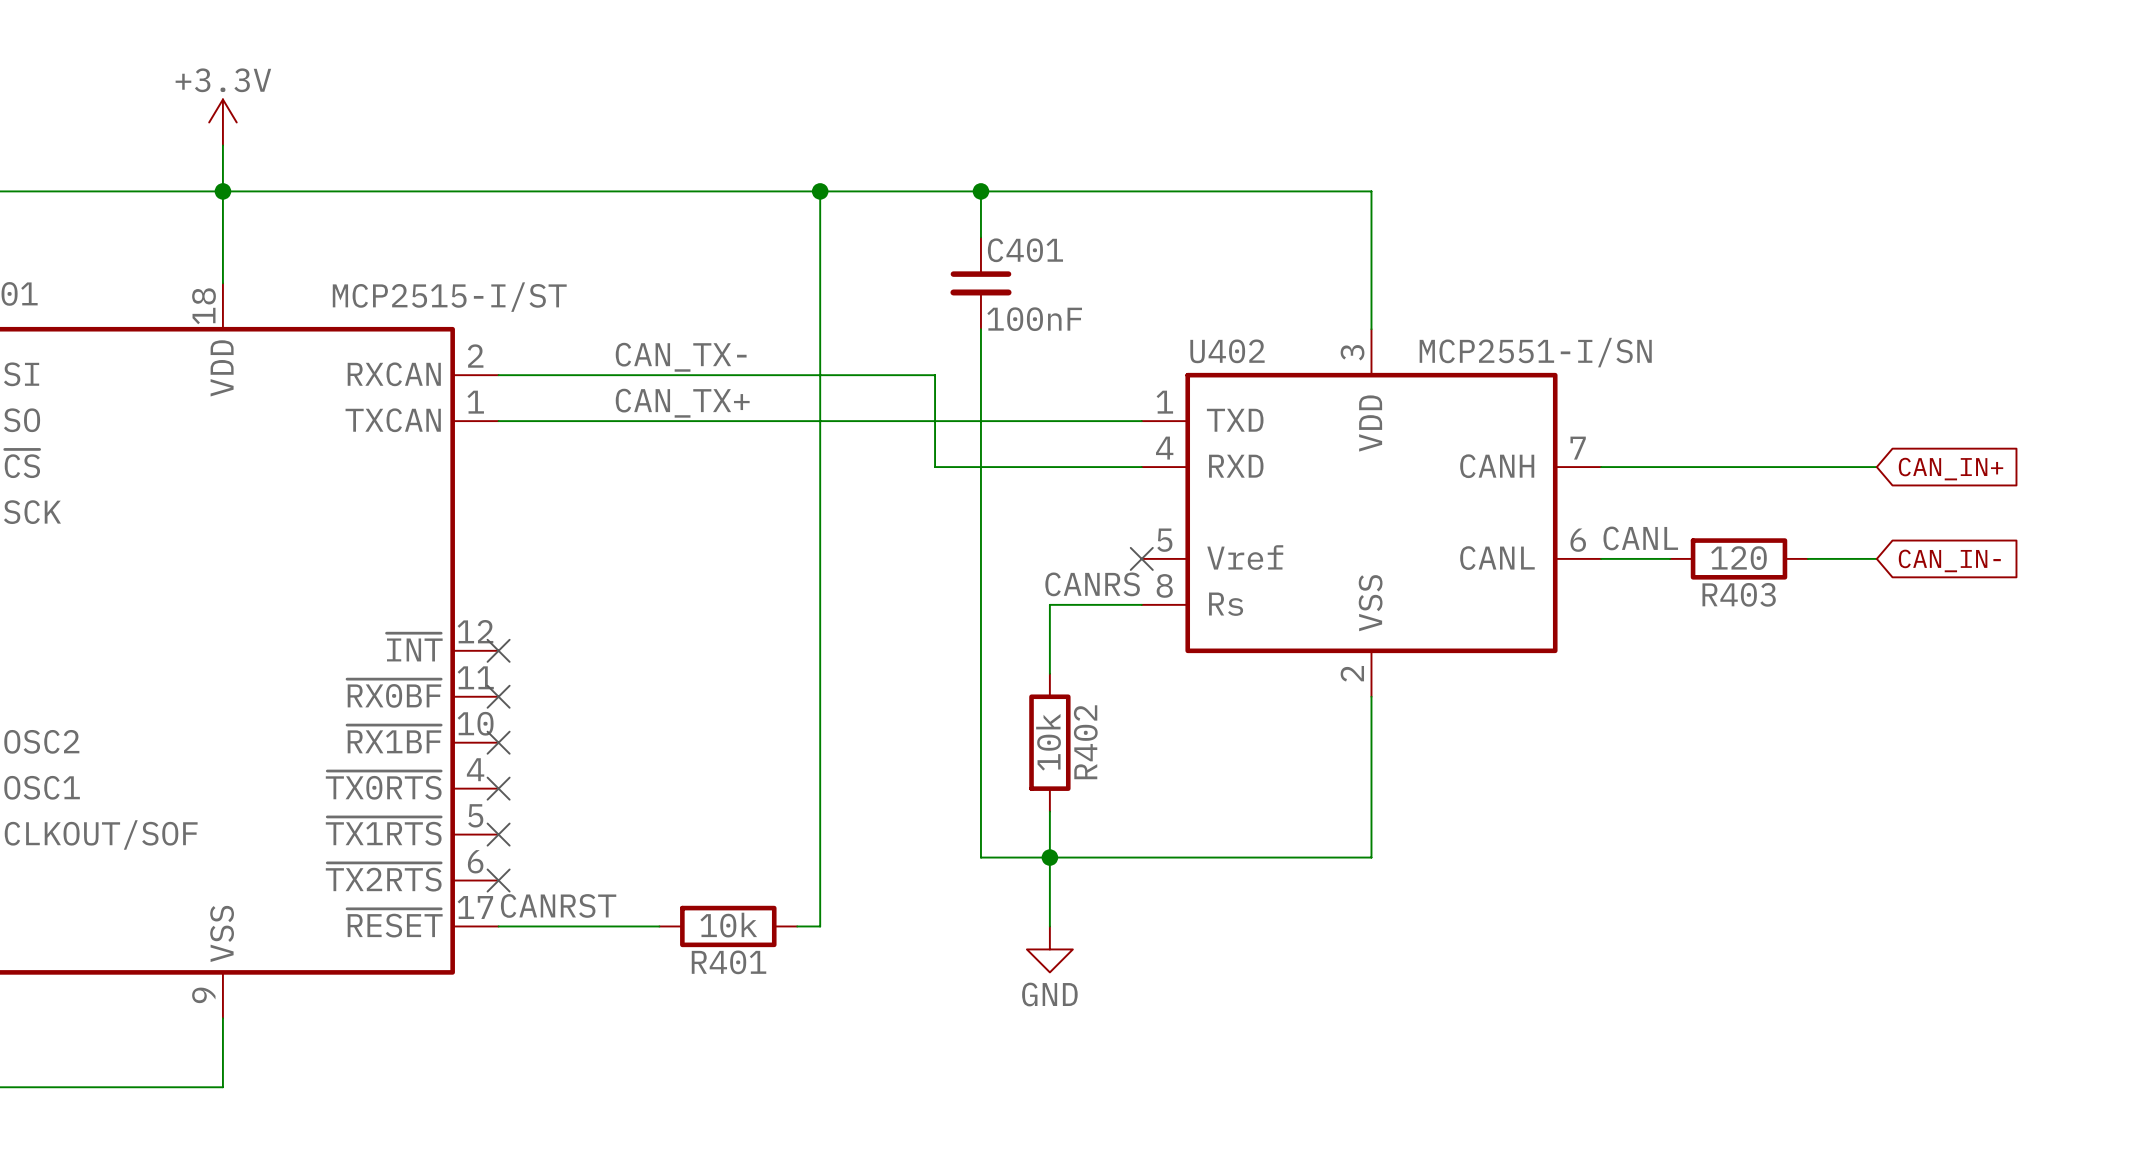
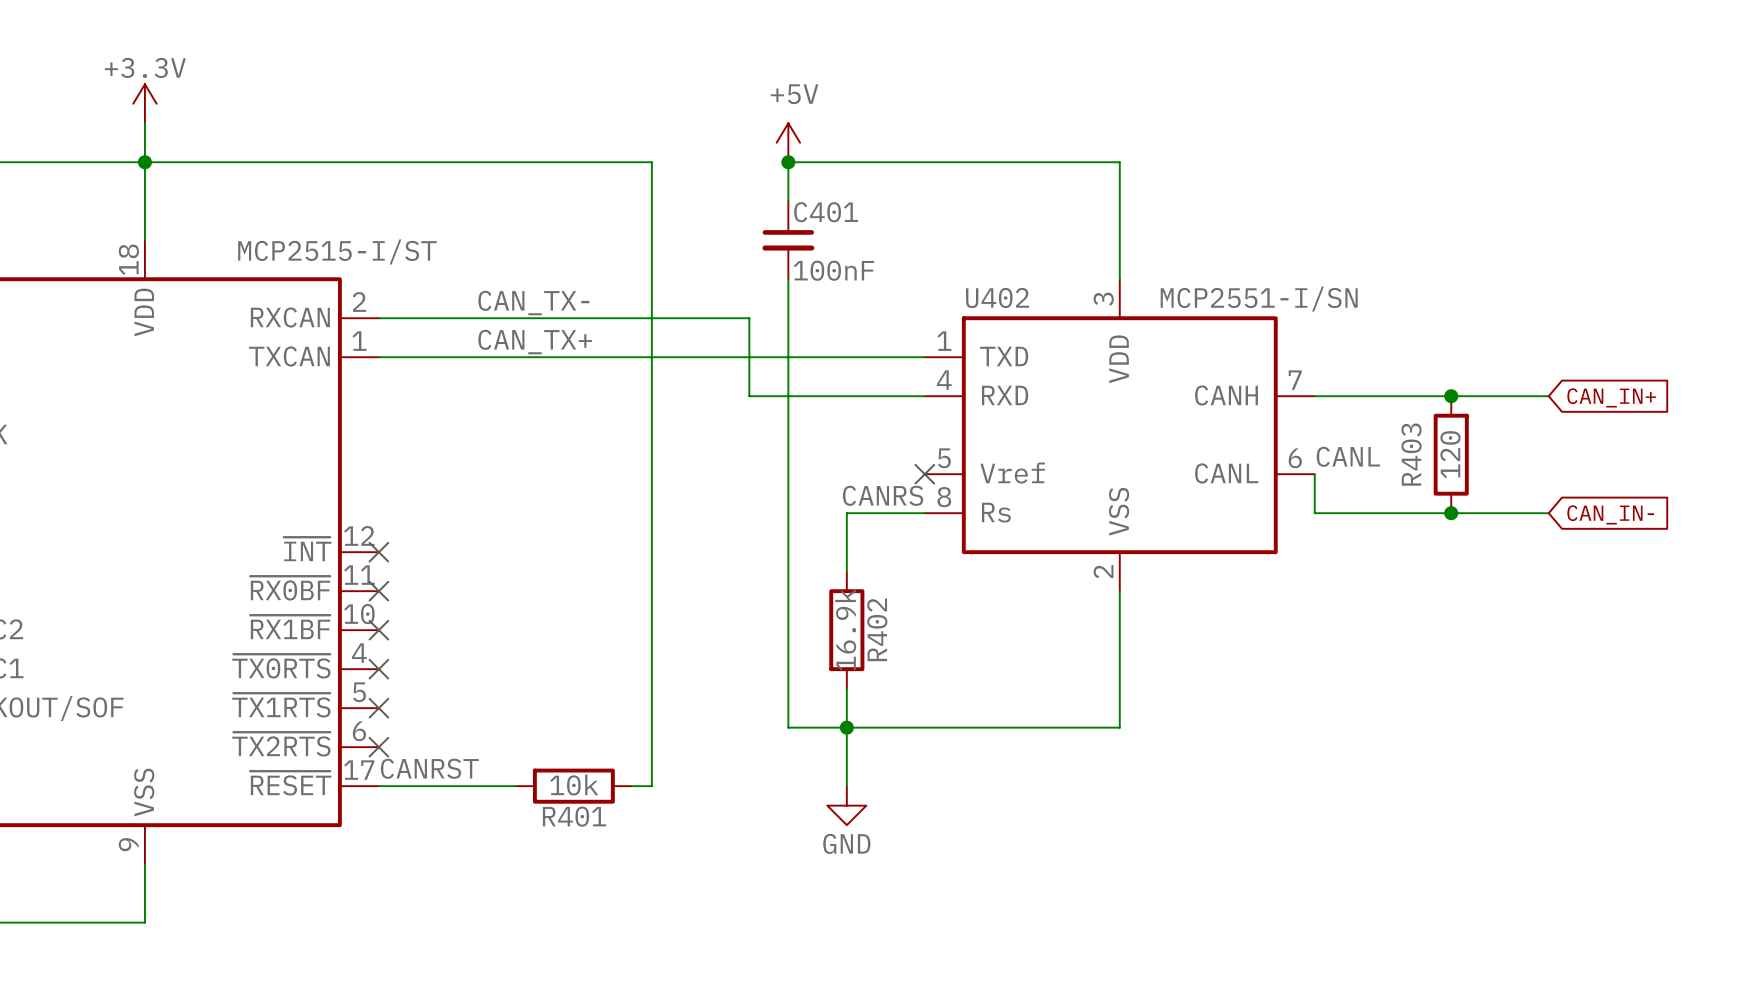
power symbol: none -> +5V (788, 142)
wire: (820, 191) (980, 191) -> none
junction: (820, 191) -> none
junction: none -> (1451, 396)
wire: (1601, 558) (1670, 558) -> (1314, 474) (1314, 513) (1548, 513)
R403 rotation: 0° (1739, 558) -> 90° clockwise (1451, 454)
wire: (1807, 558) (1876, 558) -> none
global label position: CAN_IN- (1949, 560) -> CAN_IN- (1610, 514)
junction: none -> (1451, 513)
R402 value: 10k (1048, 742) -> 16.9k (845, 629)

